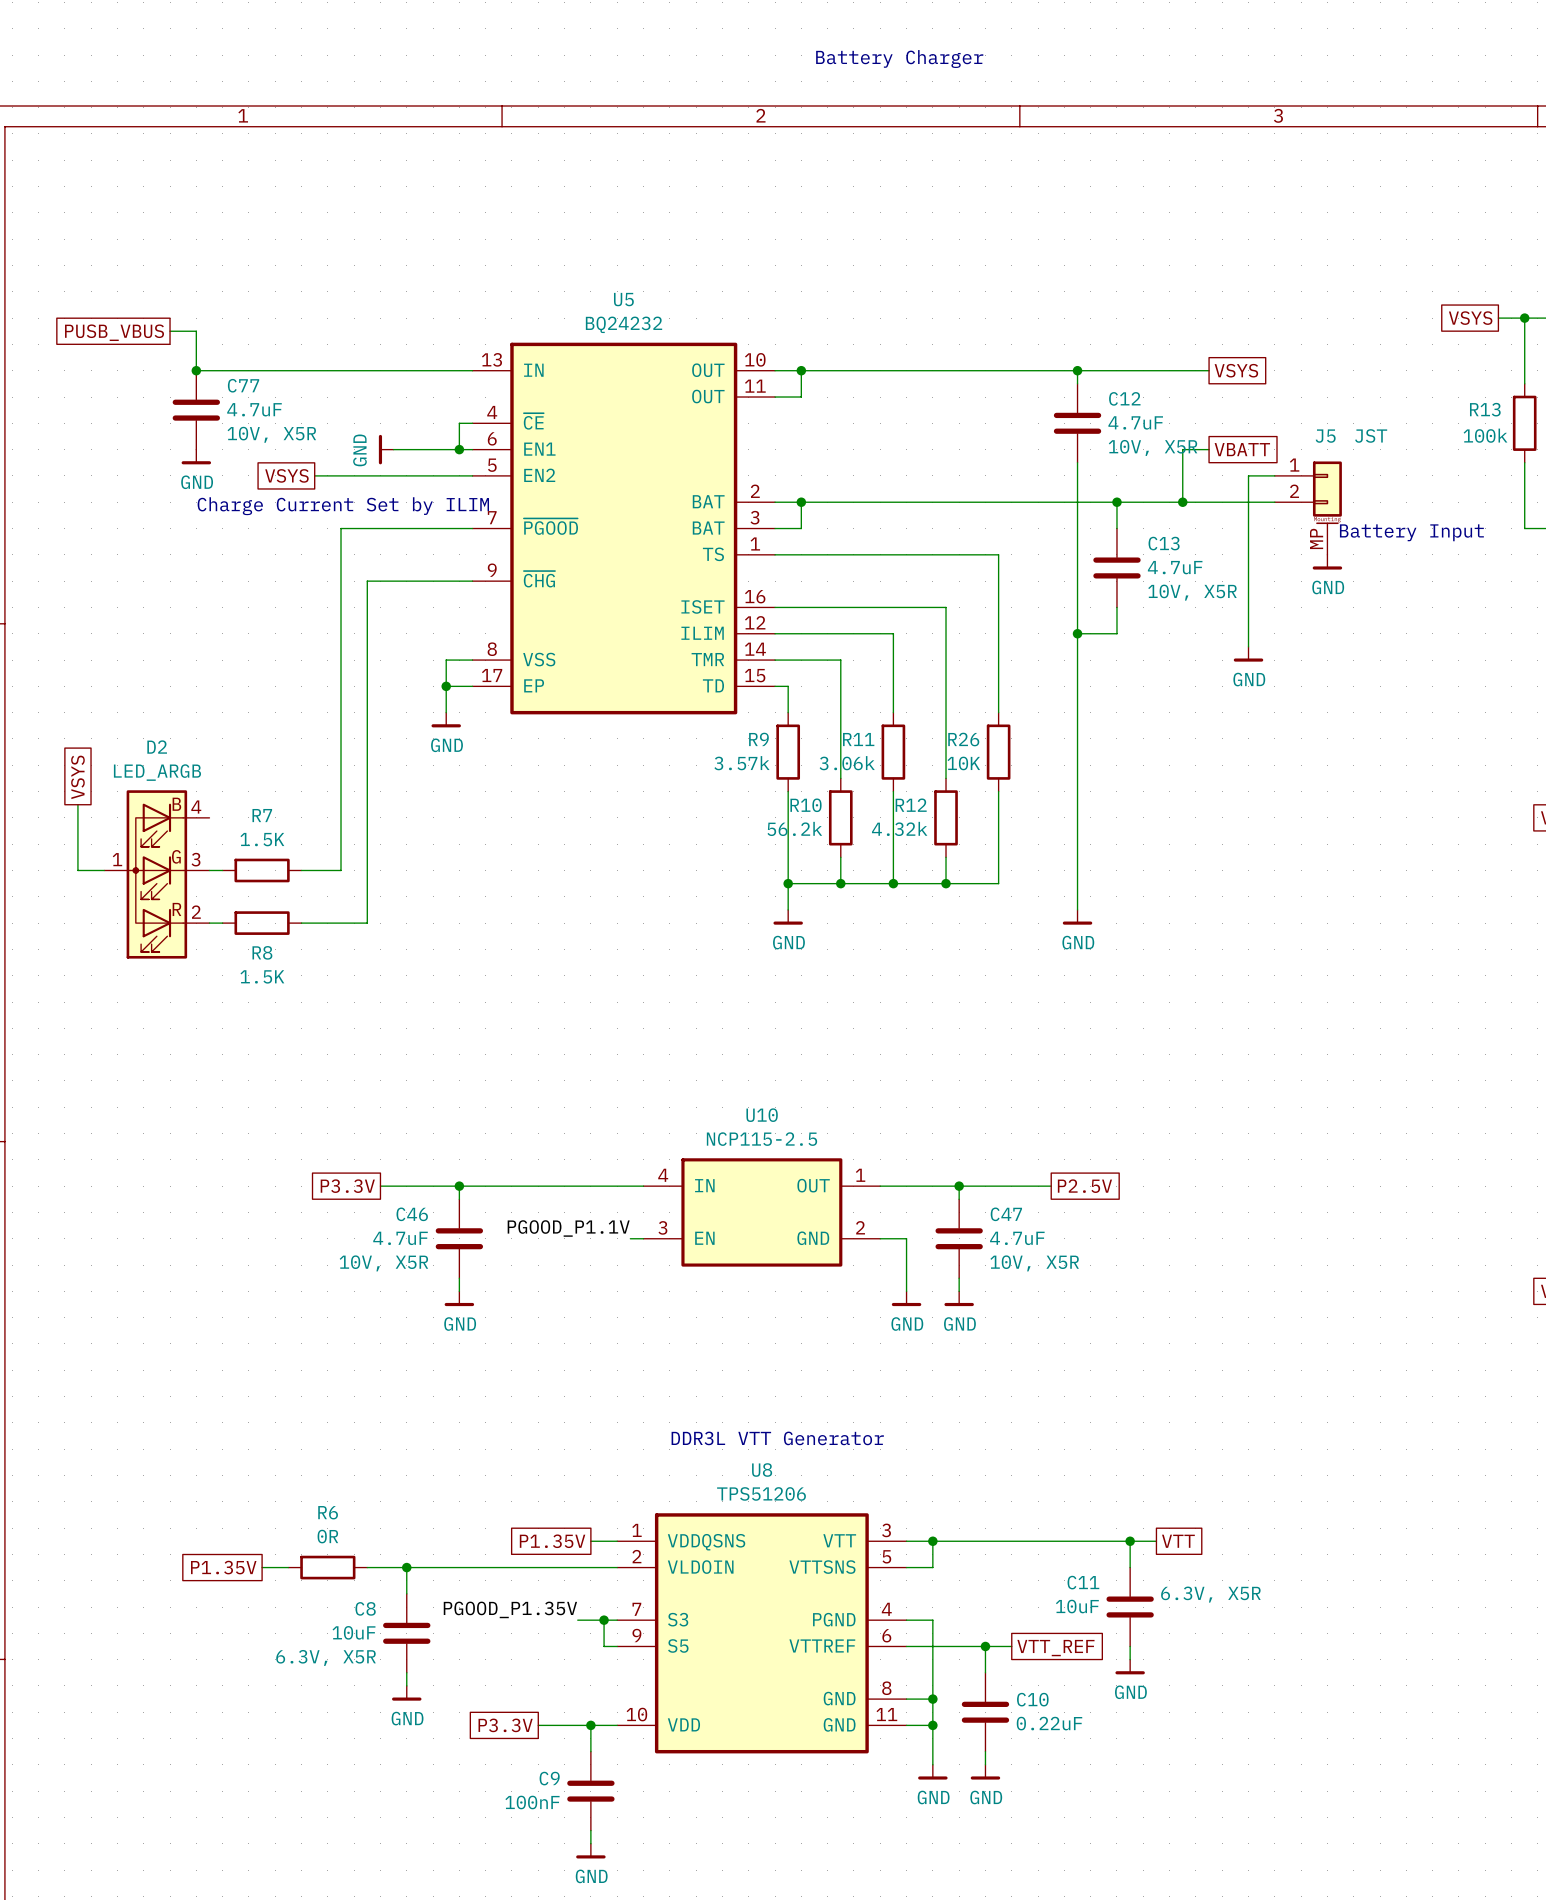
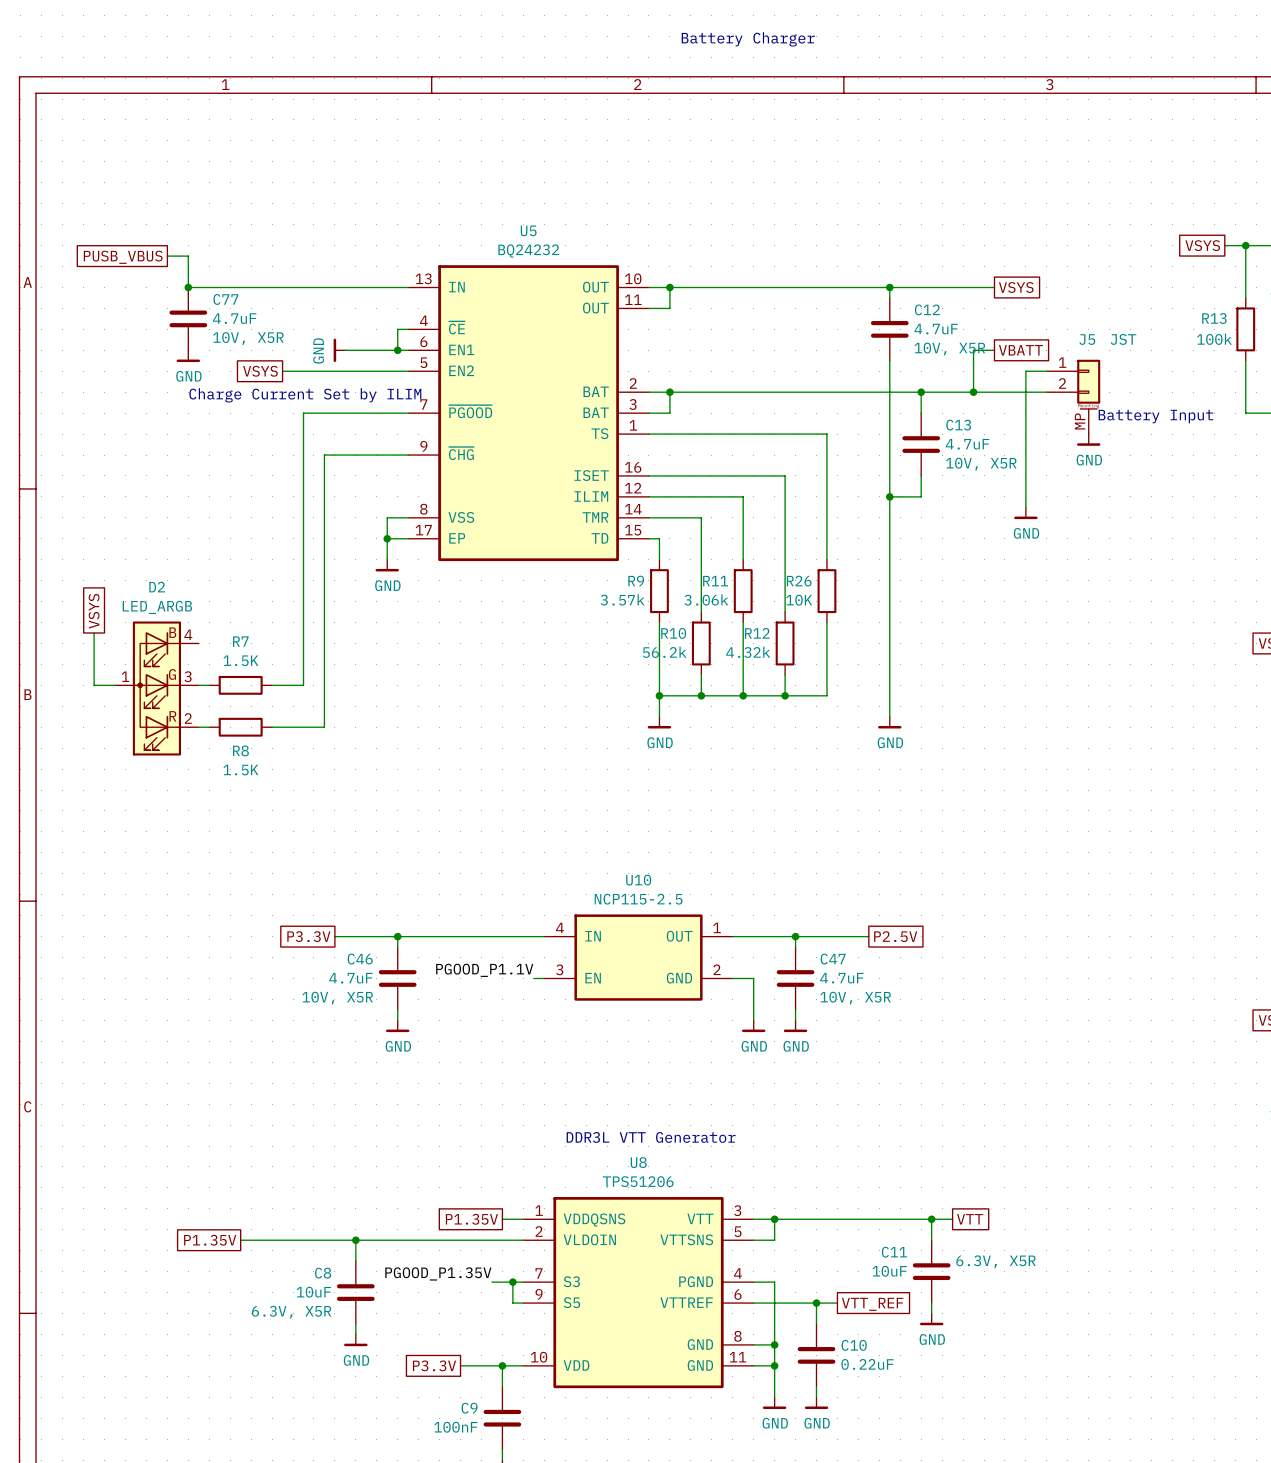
wire: none -> (261, 1240) (324, 1240)
R6: 0R (327, 1567) -> none

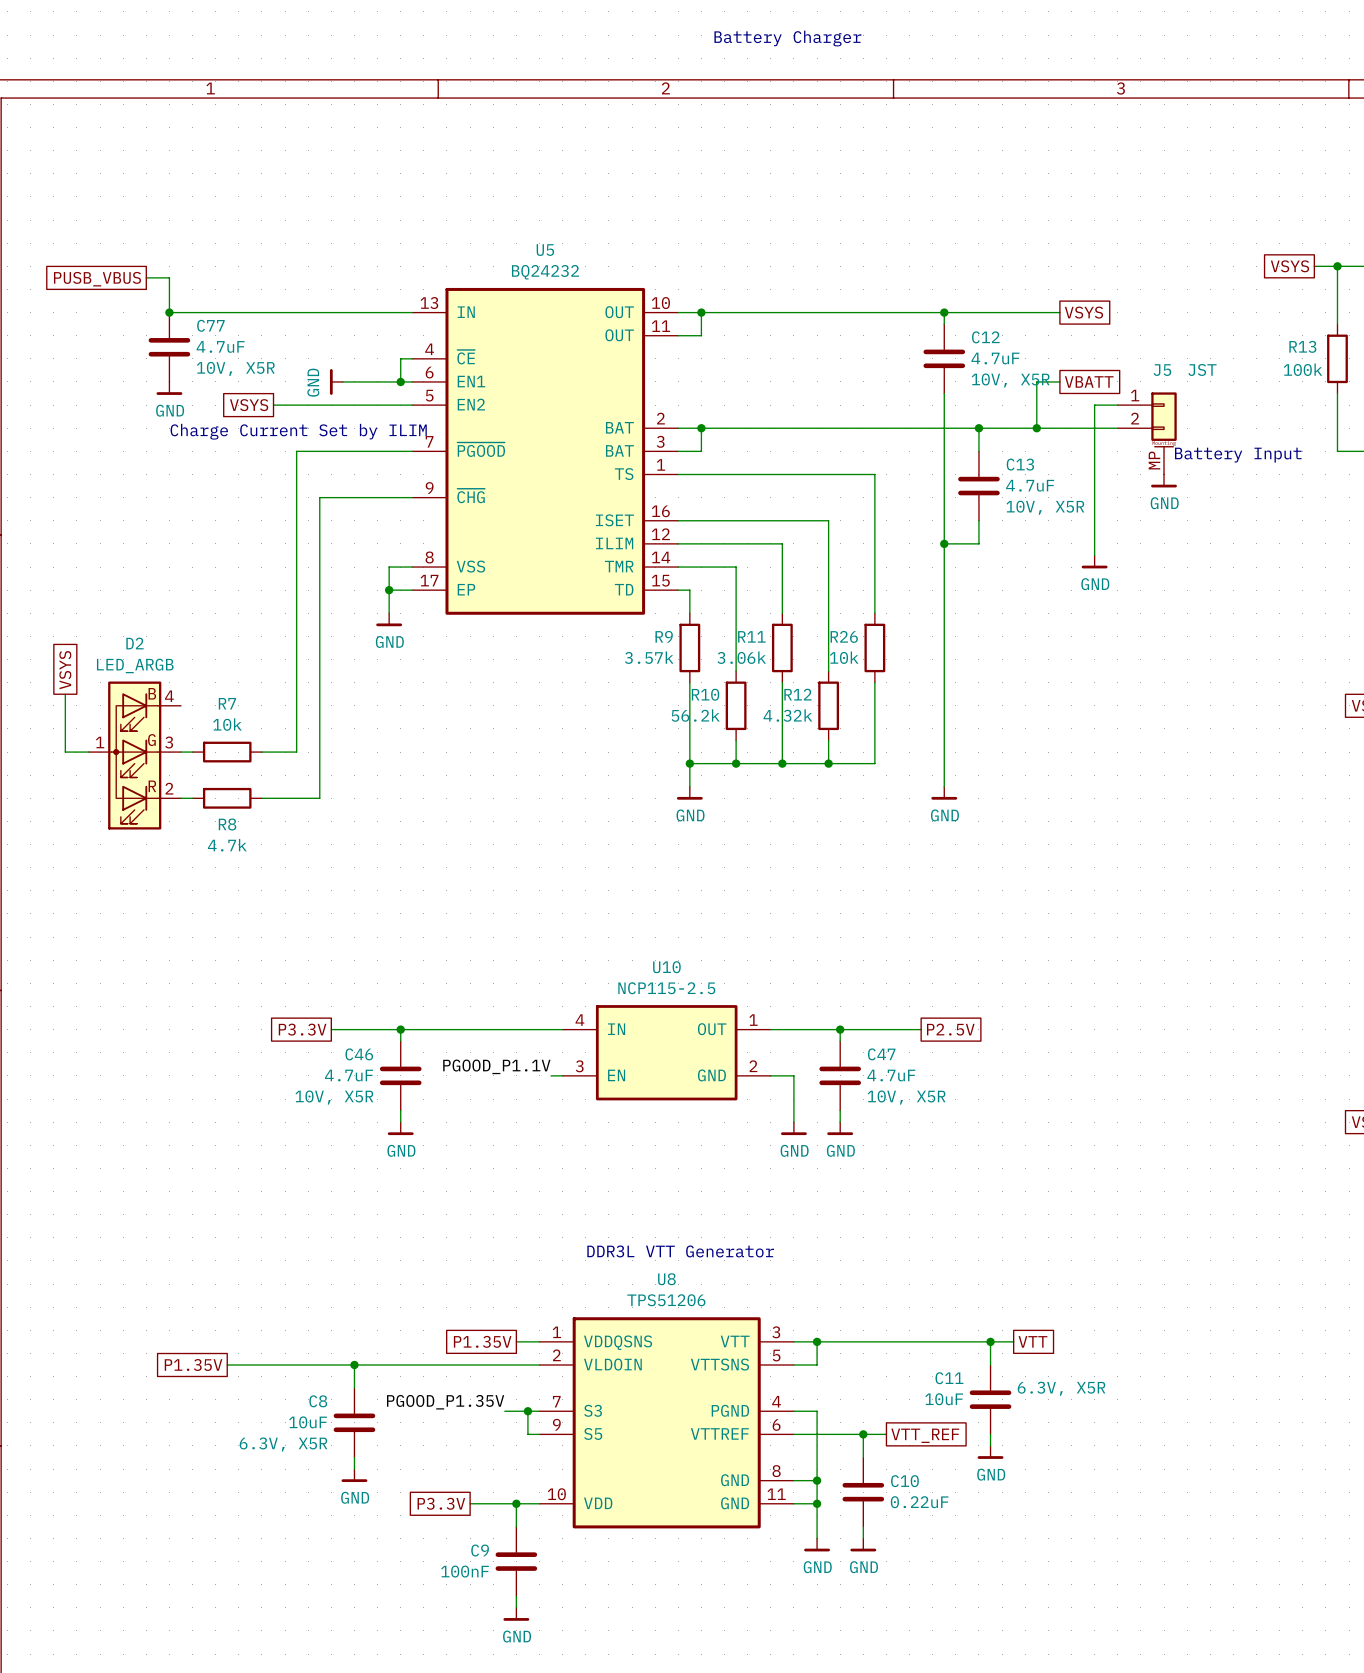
R26 value: 10K (799, 600) -> 10k (844, 657)
R7 value: 1.5K (240, 660) -> 10k (227, 724)
R8 value: 1.5K (240, 770) -> 4.7k (227, 845)

